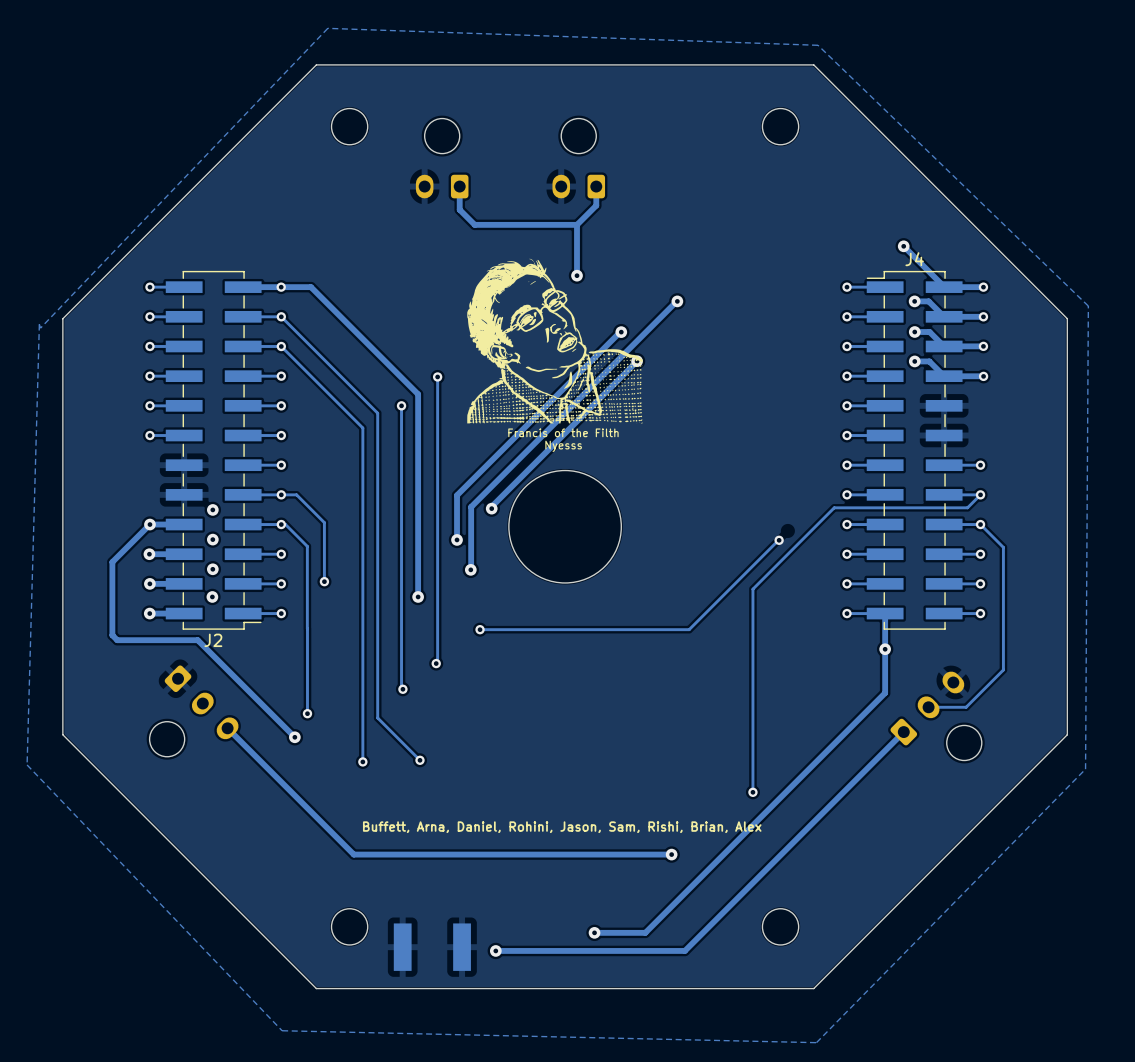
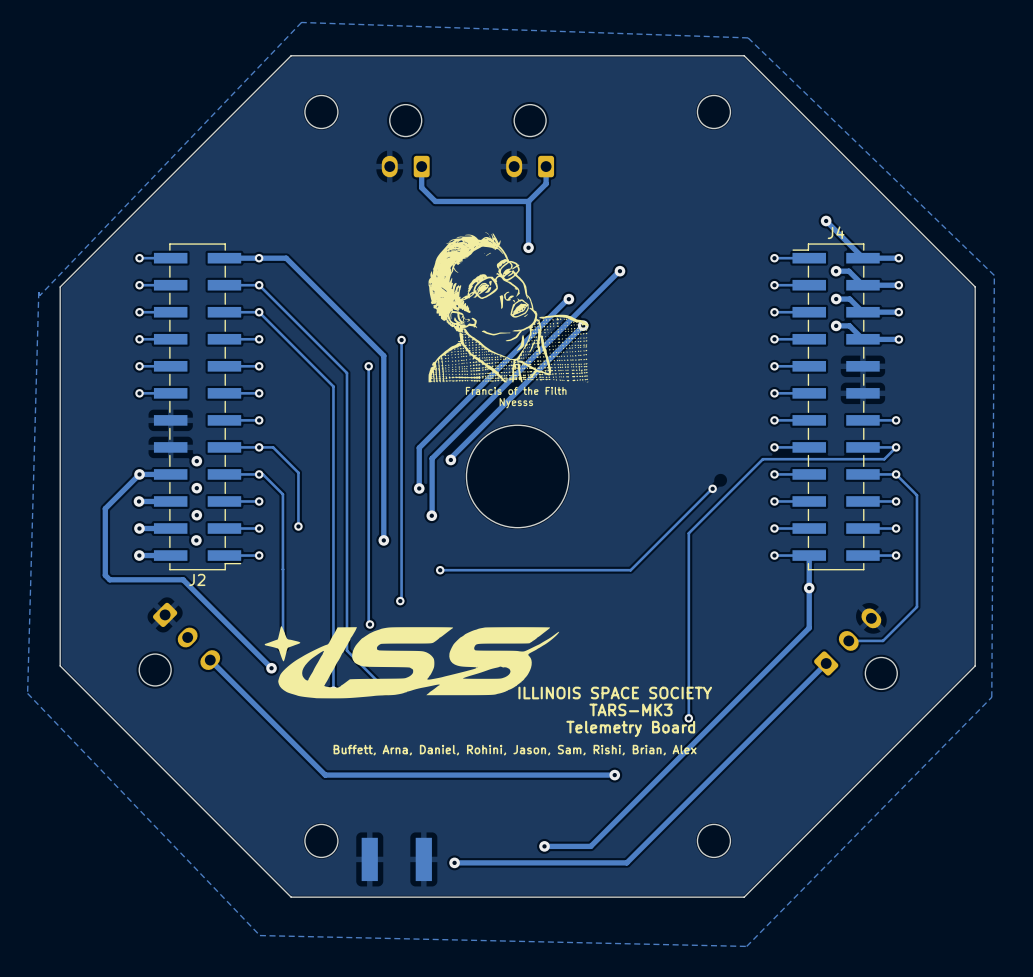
drawing: none -> [264, 626, 560, 699]
text: none -> ILLINOIS SPACE SOCIETY (615, 693)
text: none -> TARS-MK3 (630, 709)
text: none -> Telemetry Board (630, 728)

